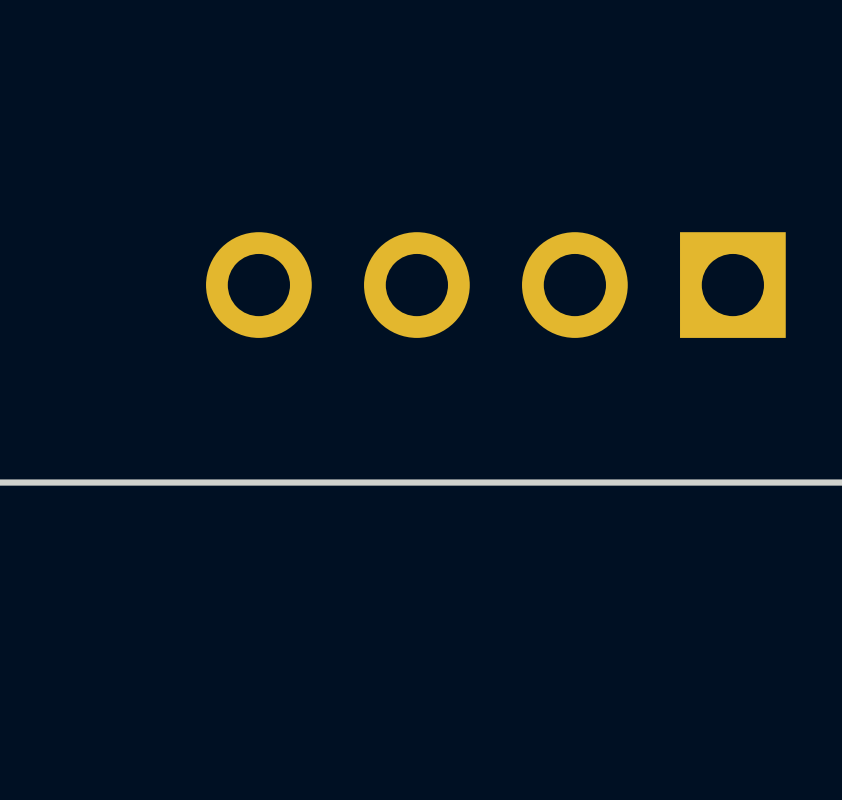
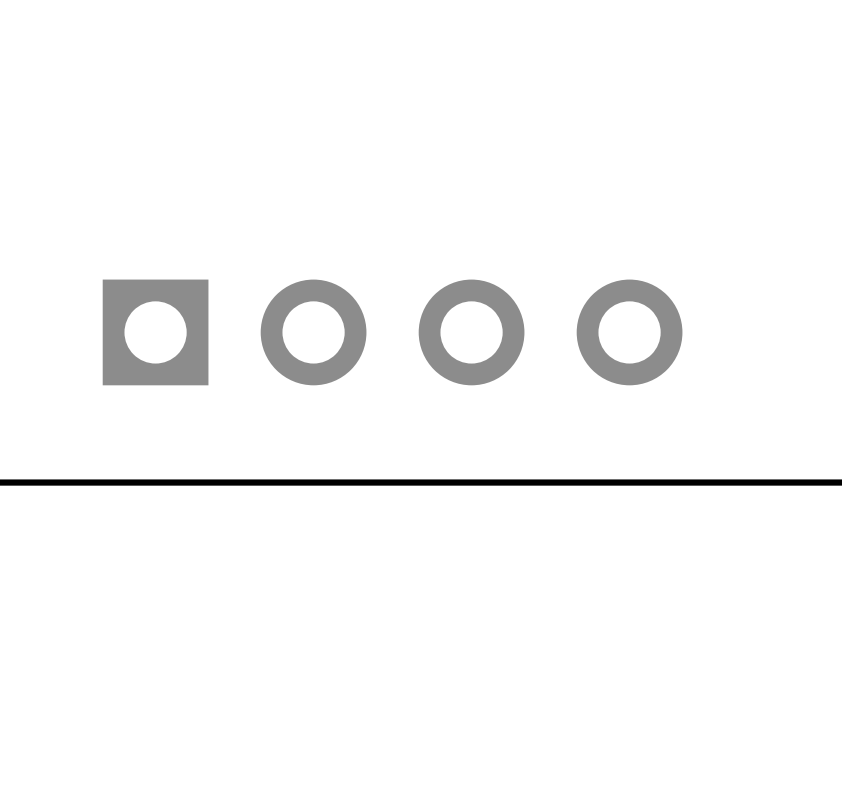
part rotation: 0° (495, 285) -> 180° (392, 332)

